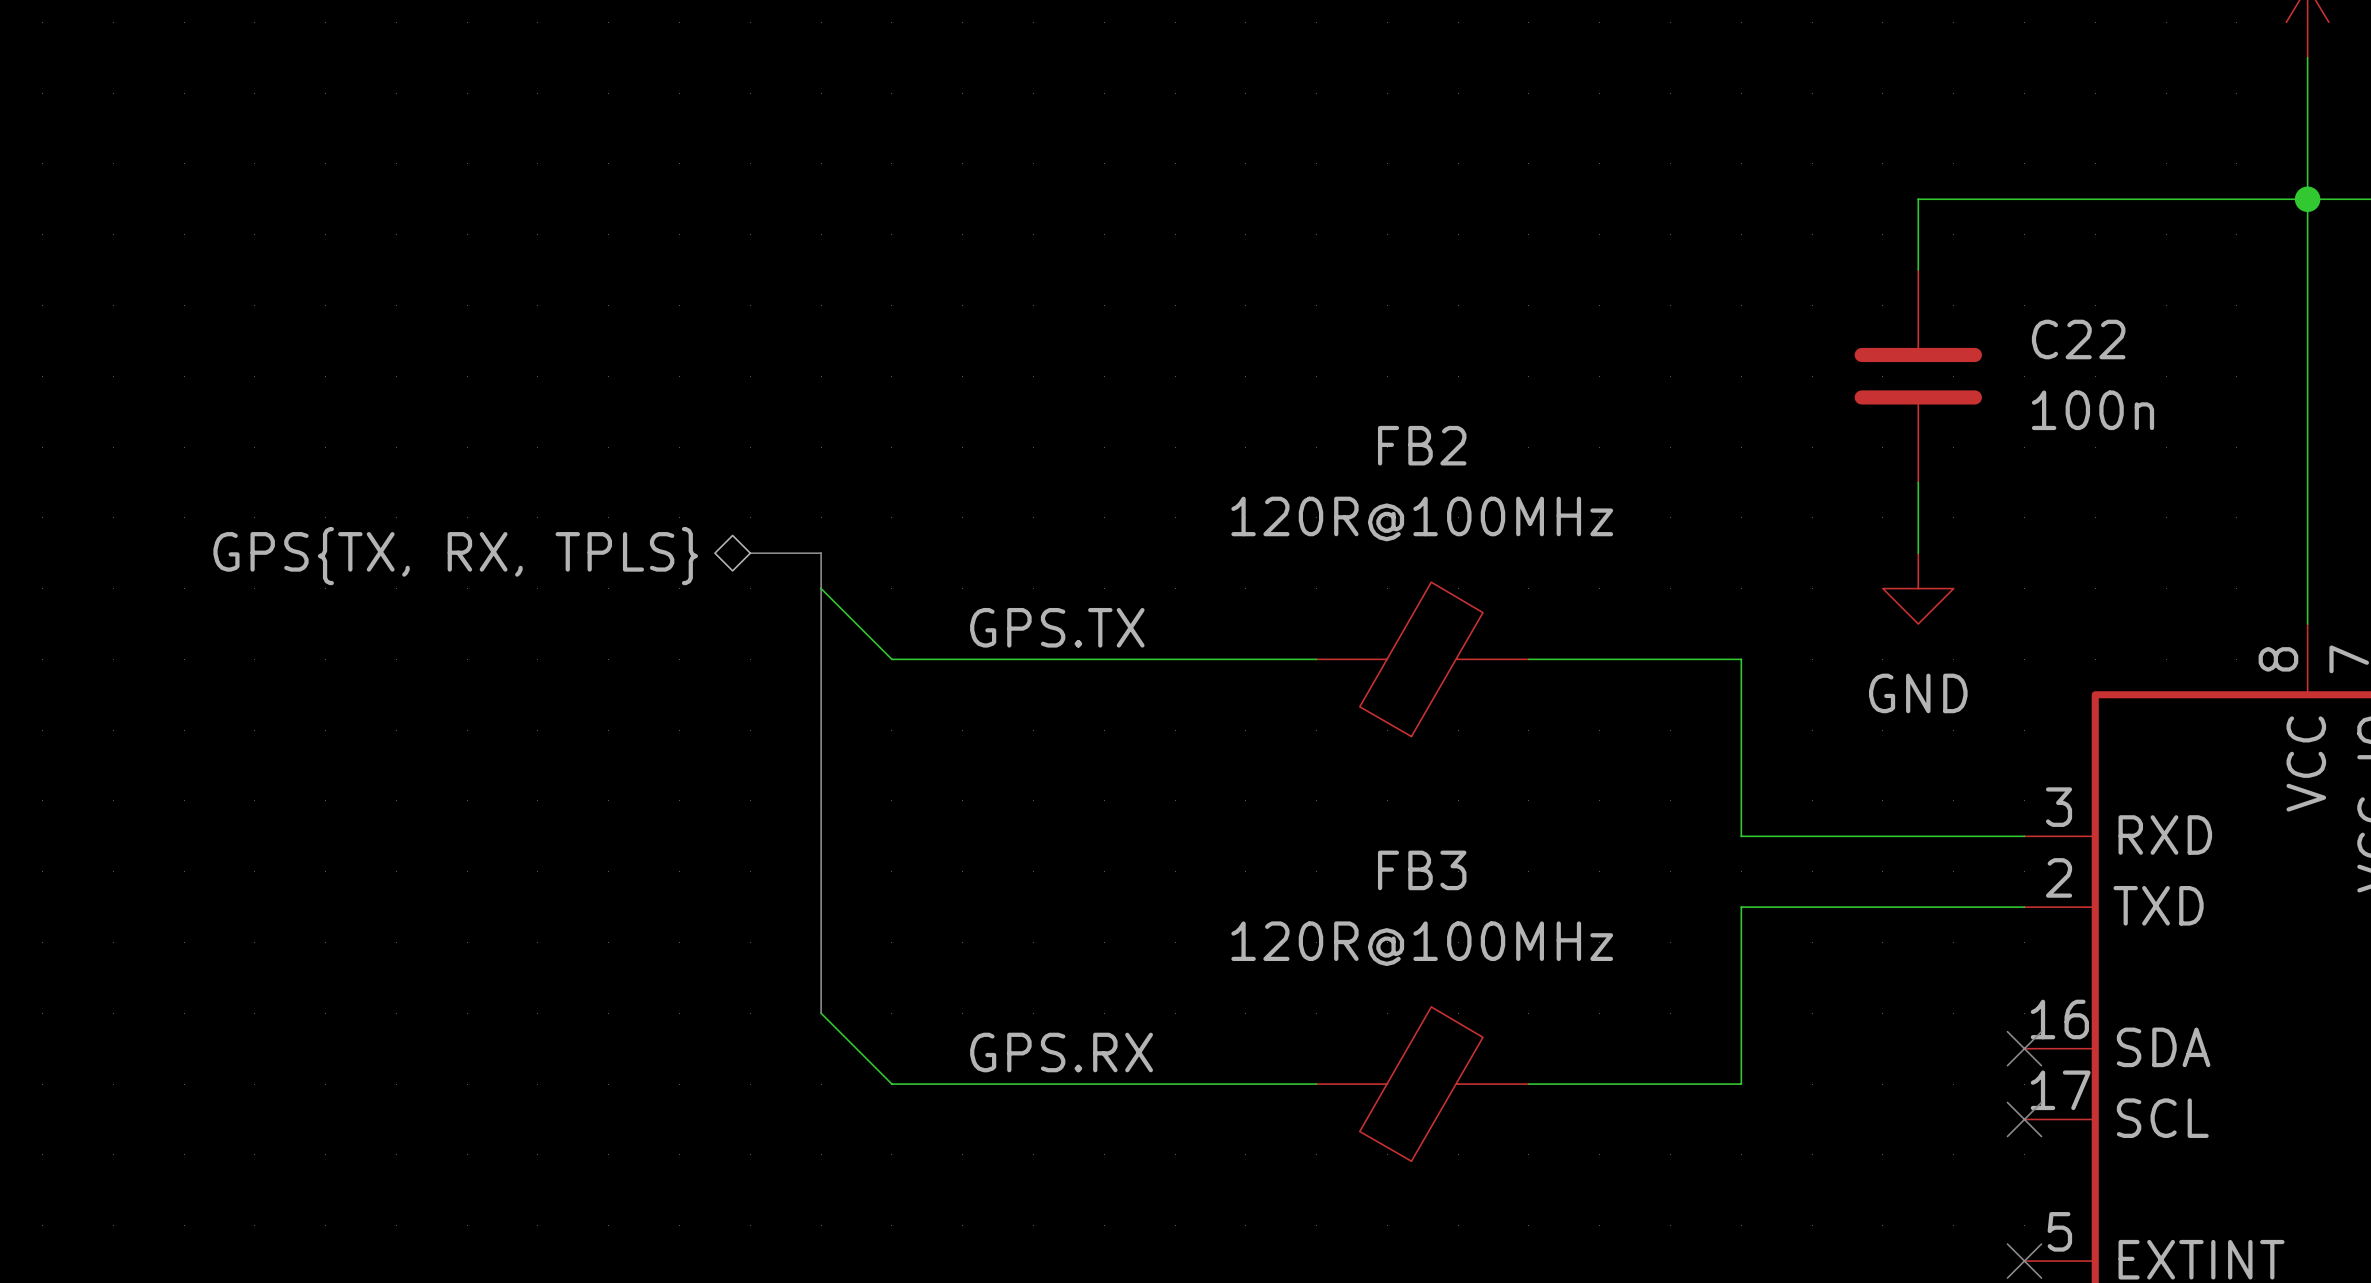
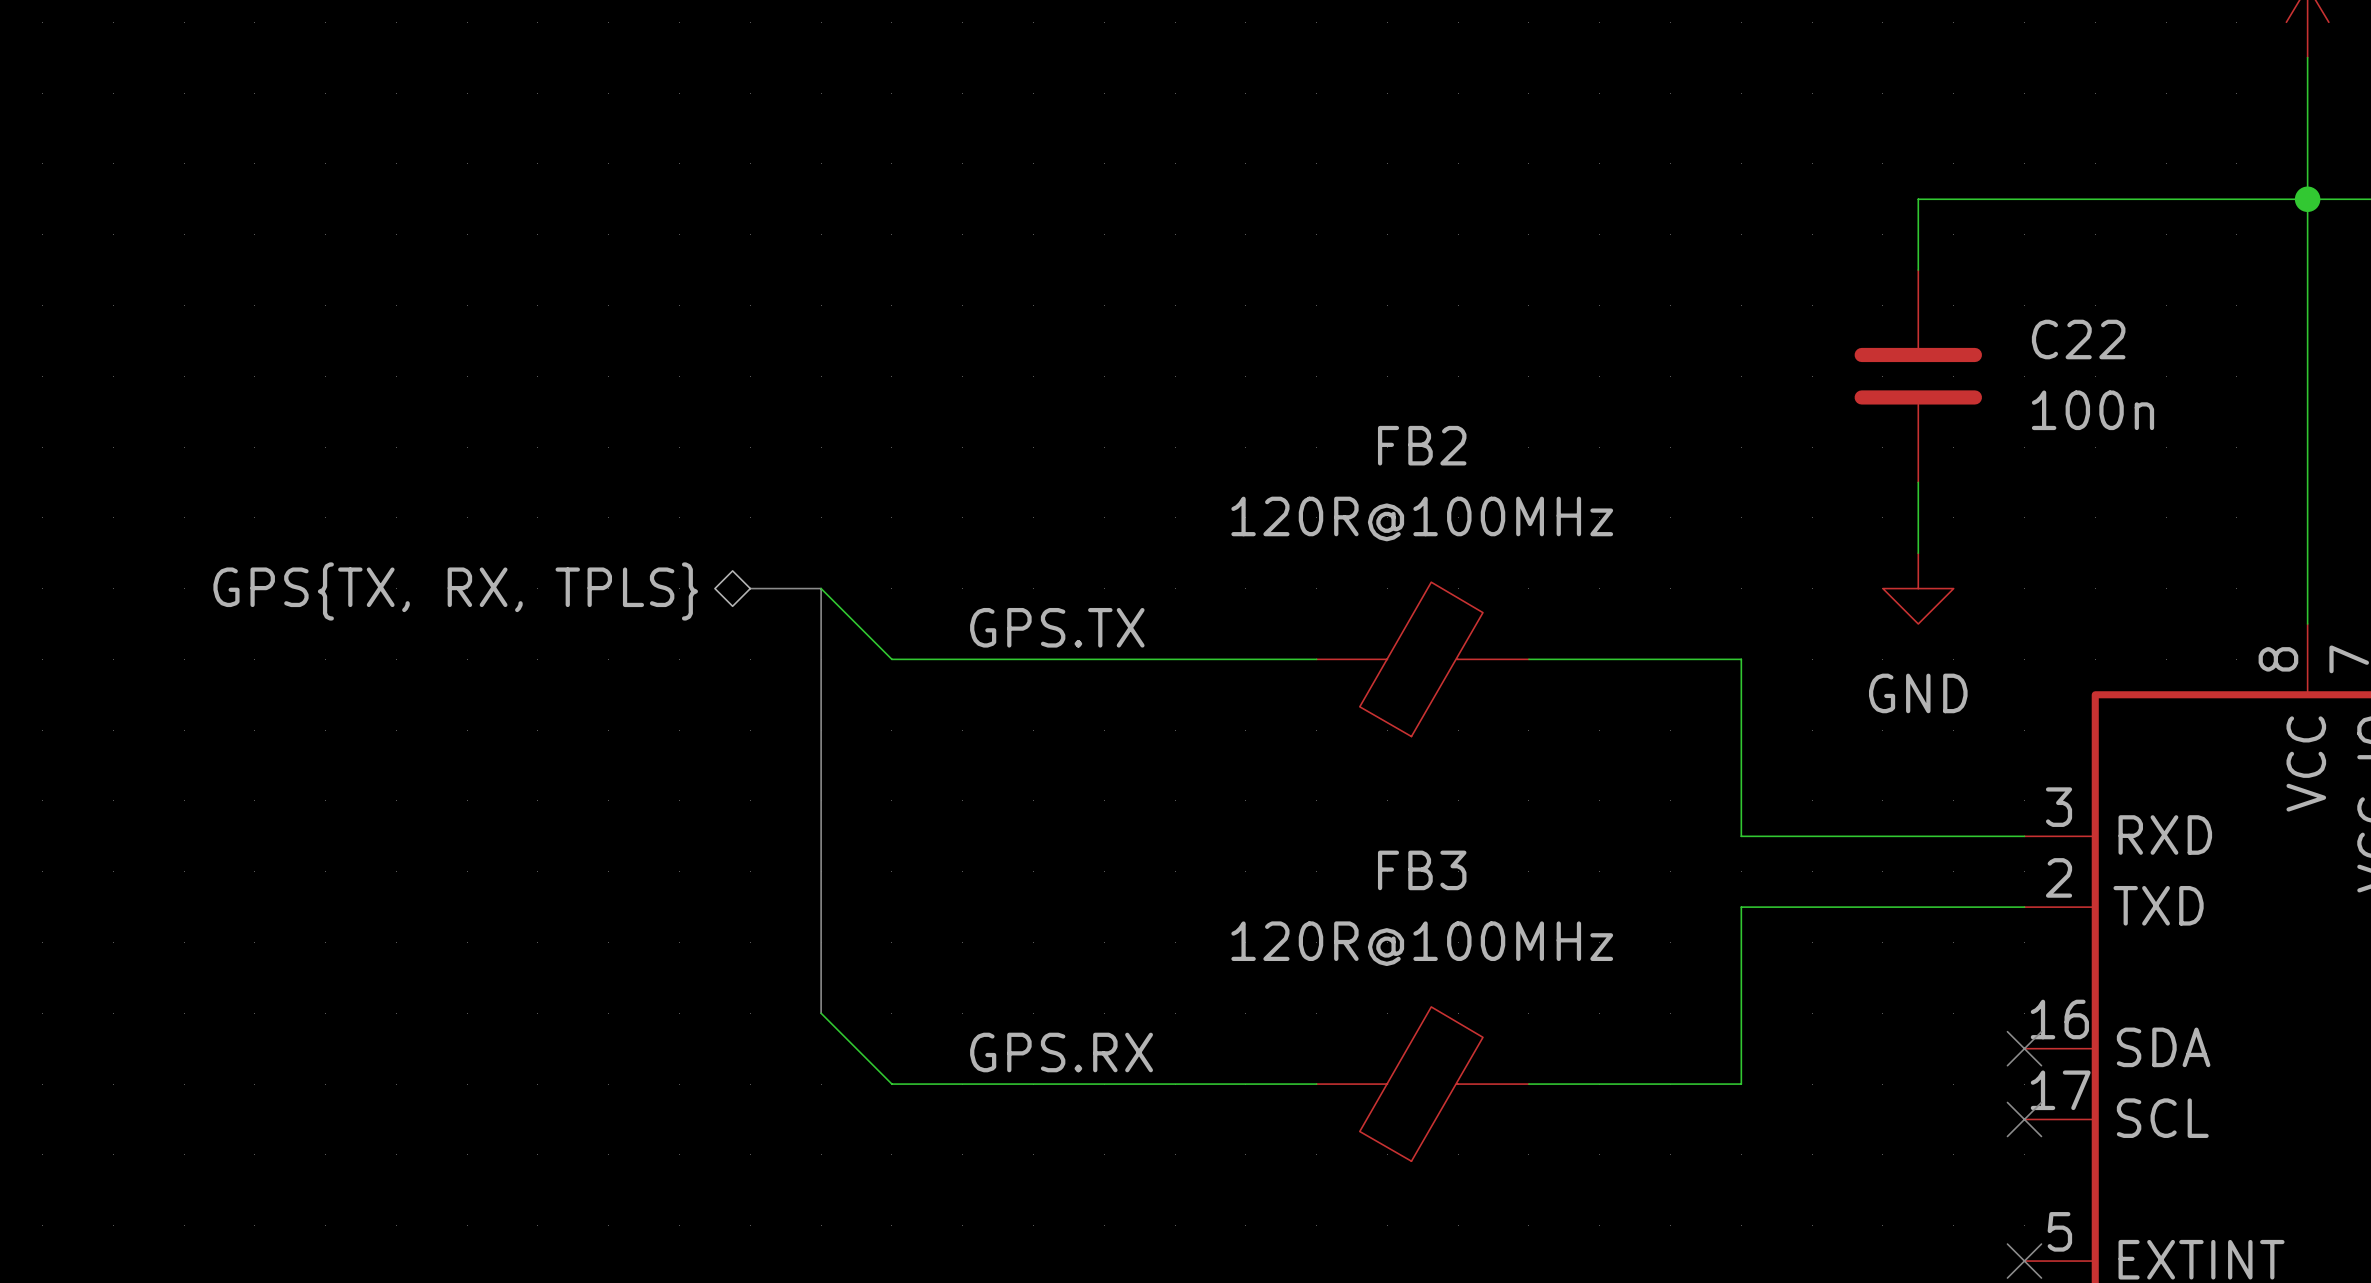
bus: (750, 553) (821, 553) (821, 588) -> (750, 588) (821, 588)
hierarchical label position: GPS{TX, RX, TPLS} (455, 556) -> GPS{TX, RX, TPLS} (455, 591)

